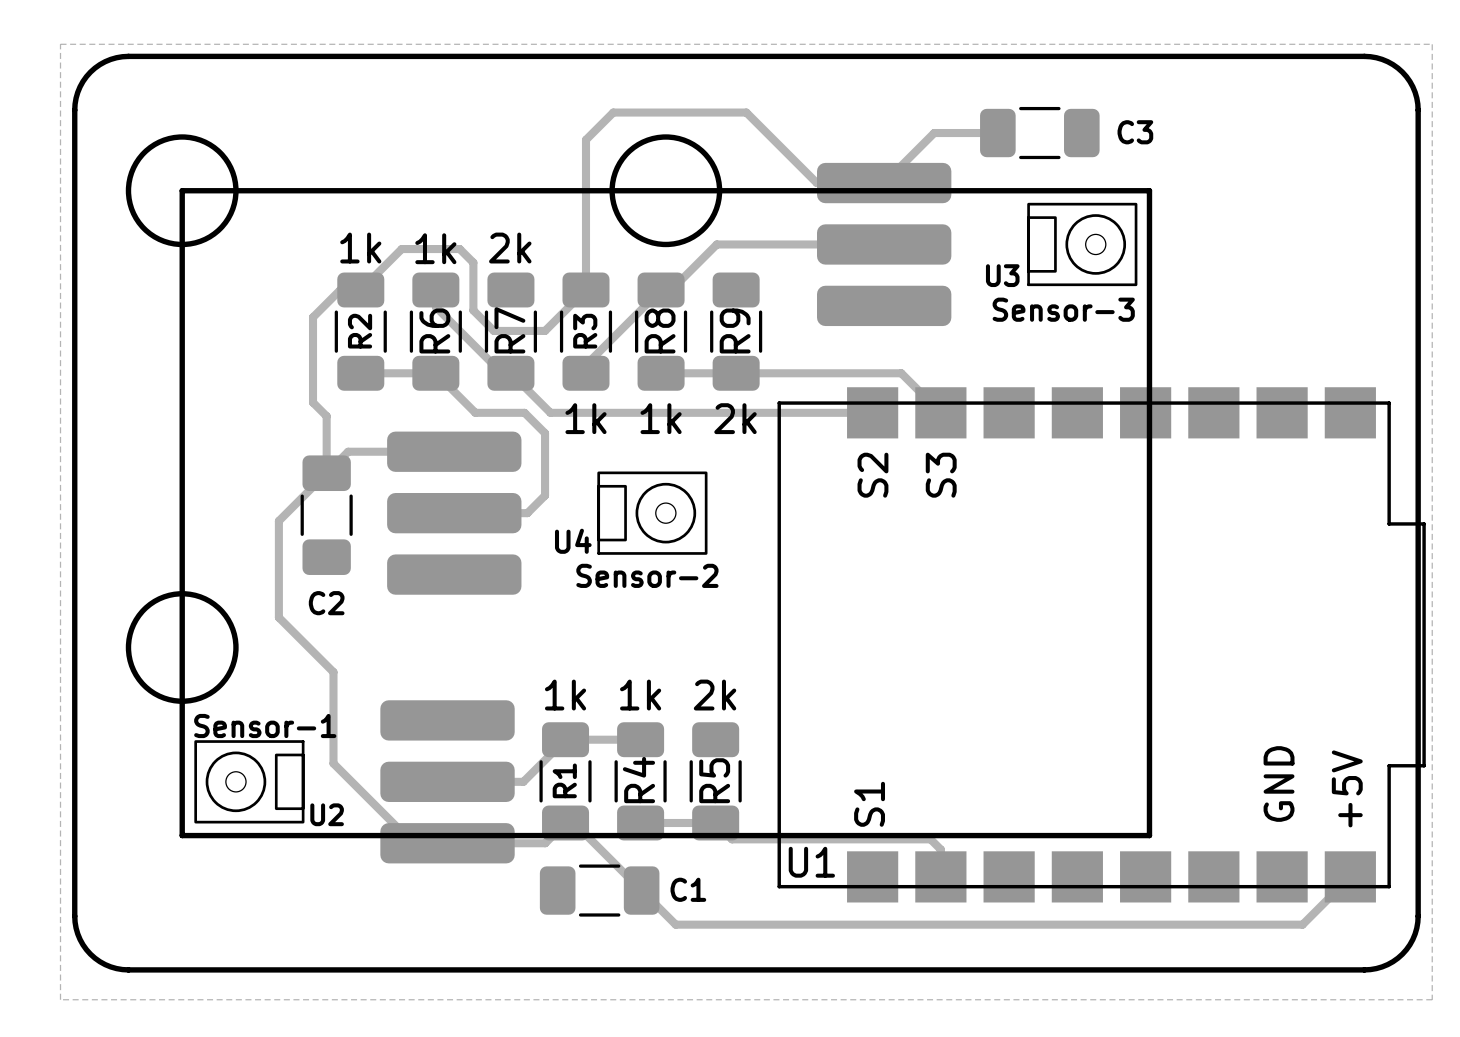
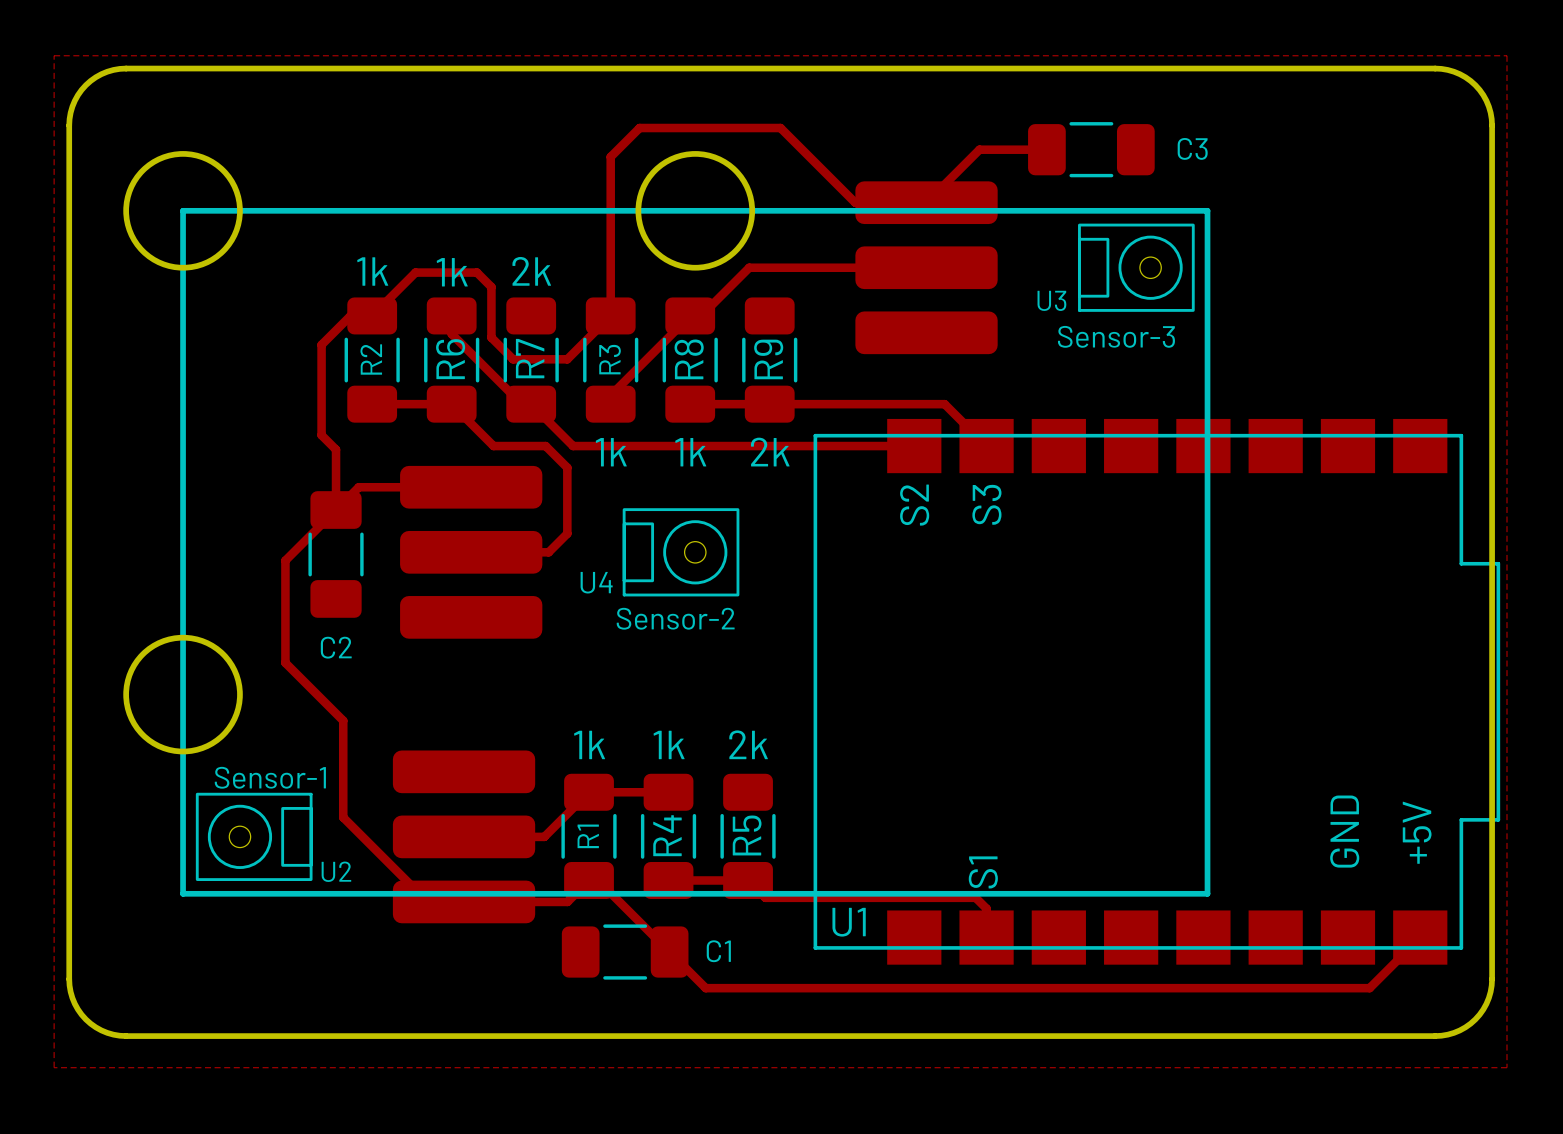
text position: S1 (869, 804) -> S1 (983, 872)

